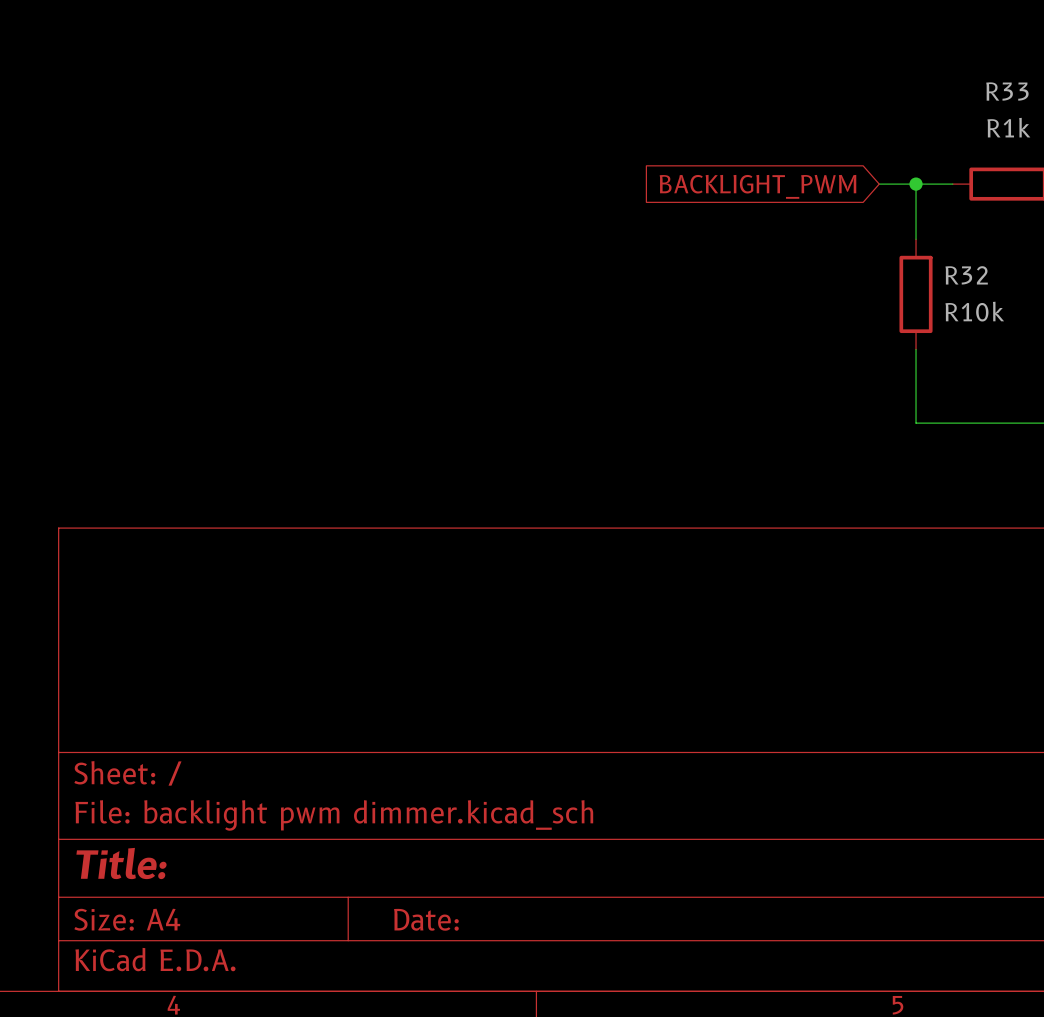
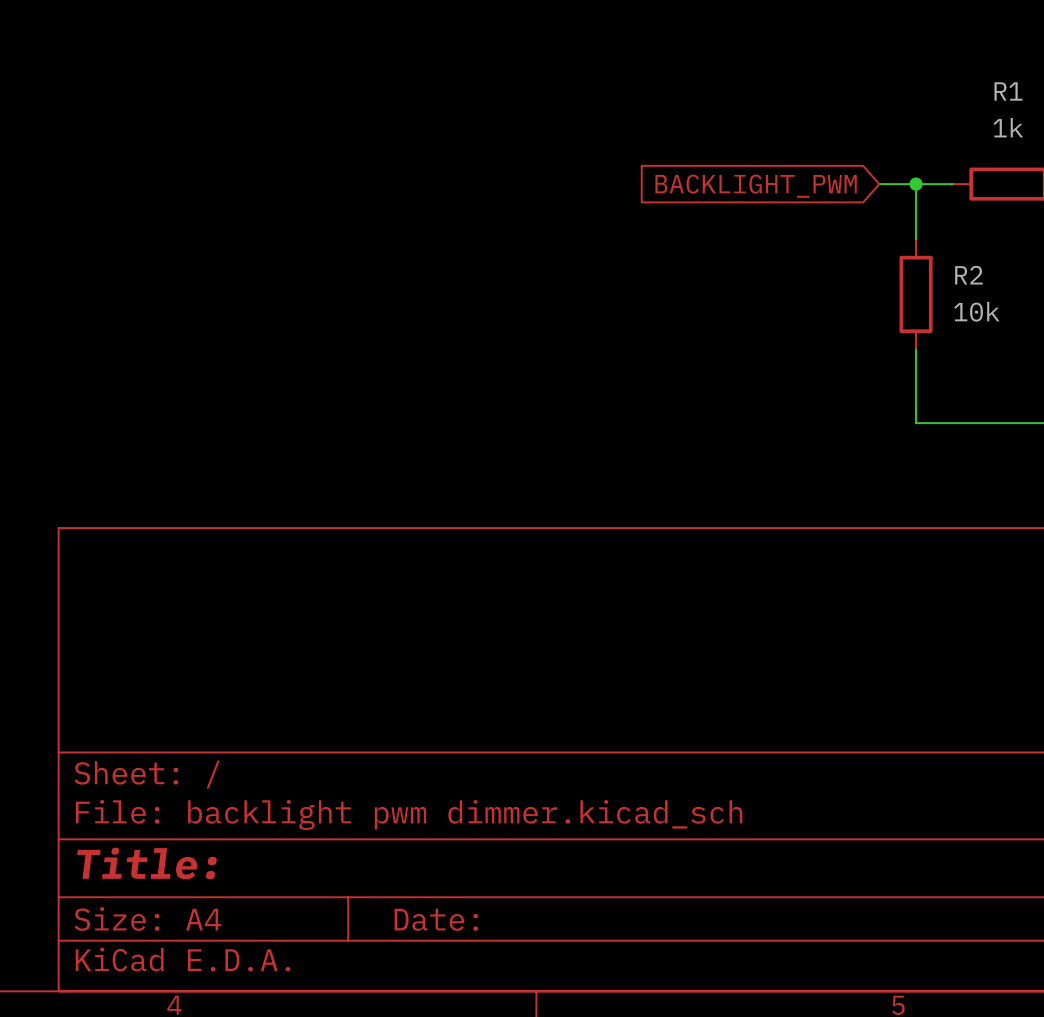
R33 name: R33 (1007, 91) -> R1 (1008, 91)
R33 value: R1k (1008, 127) -> 1k (1008, 127)
R32 name: R32 (966, 275) -> R2 (968, 275)
R32 value: R10k (974, 311) -> 10k (976, 311)

